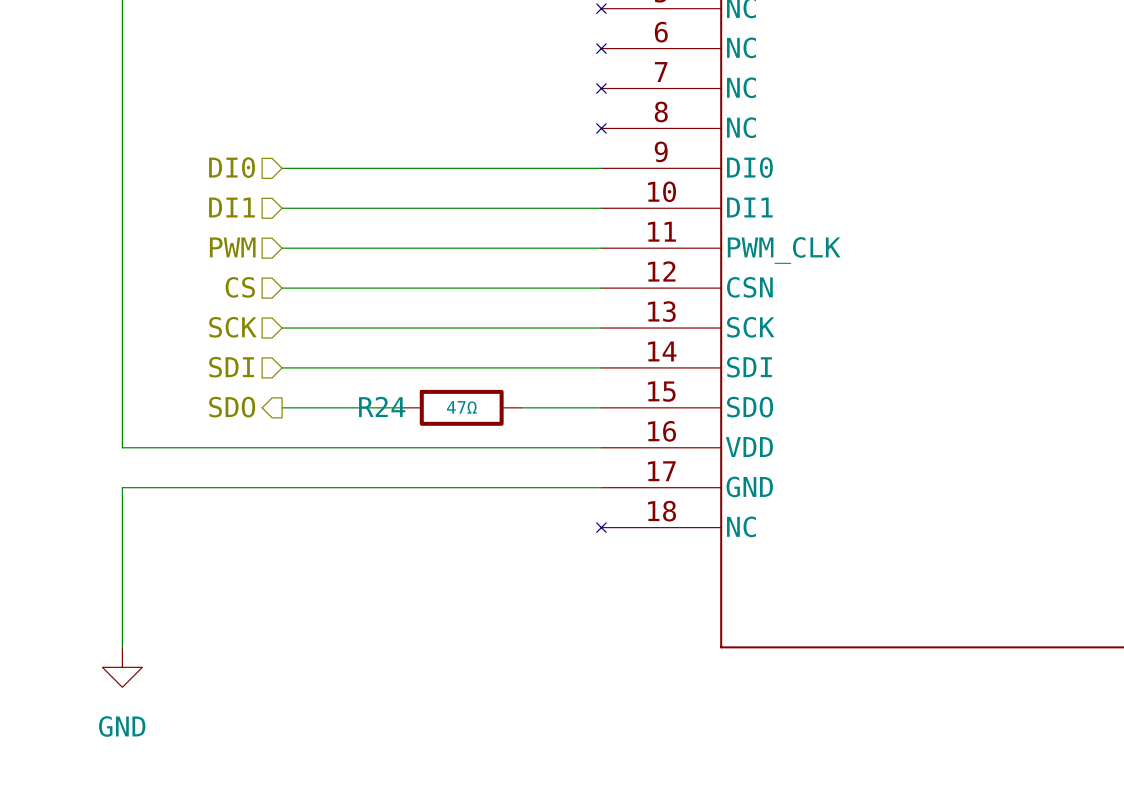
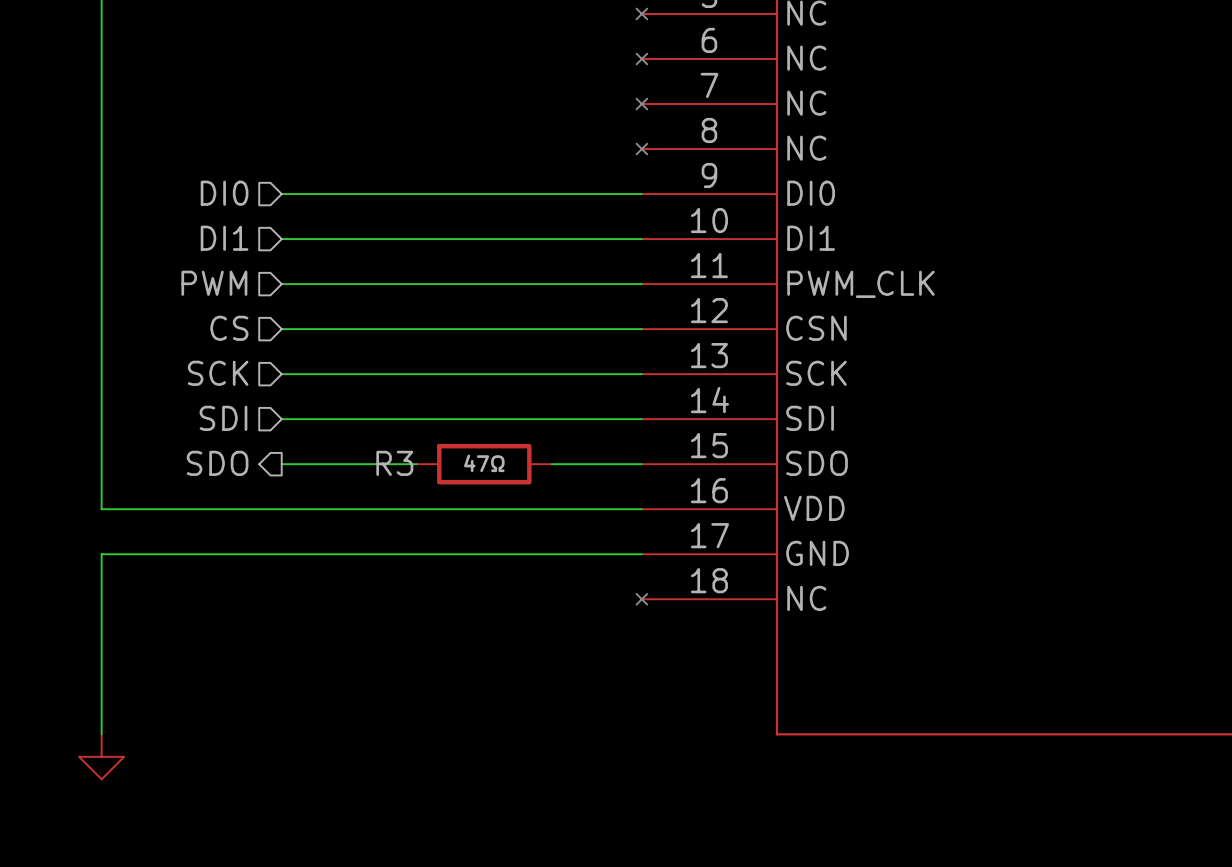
R24 name: R24 (382, 406) -> R3 (394, 463)
power symbol text: GND (122, 726) -> none

